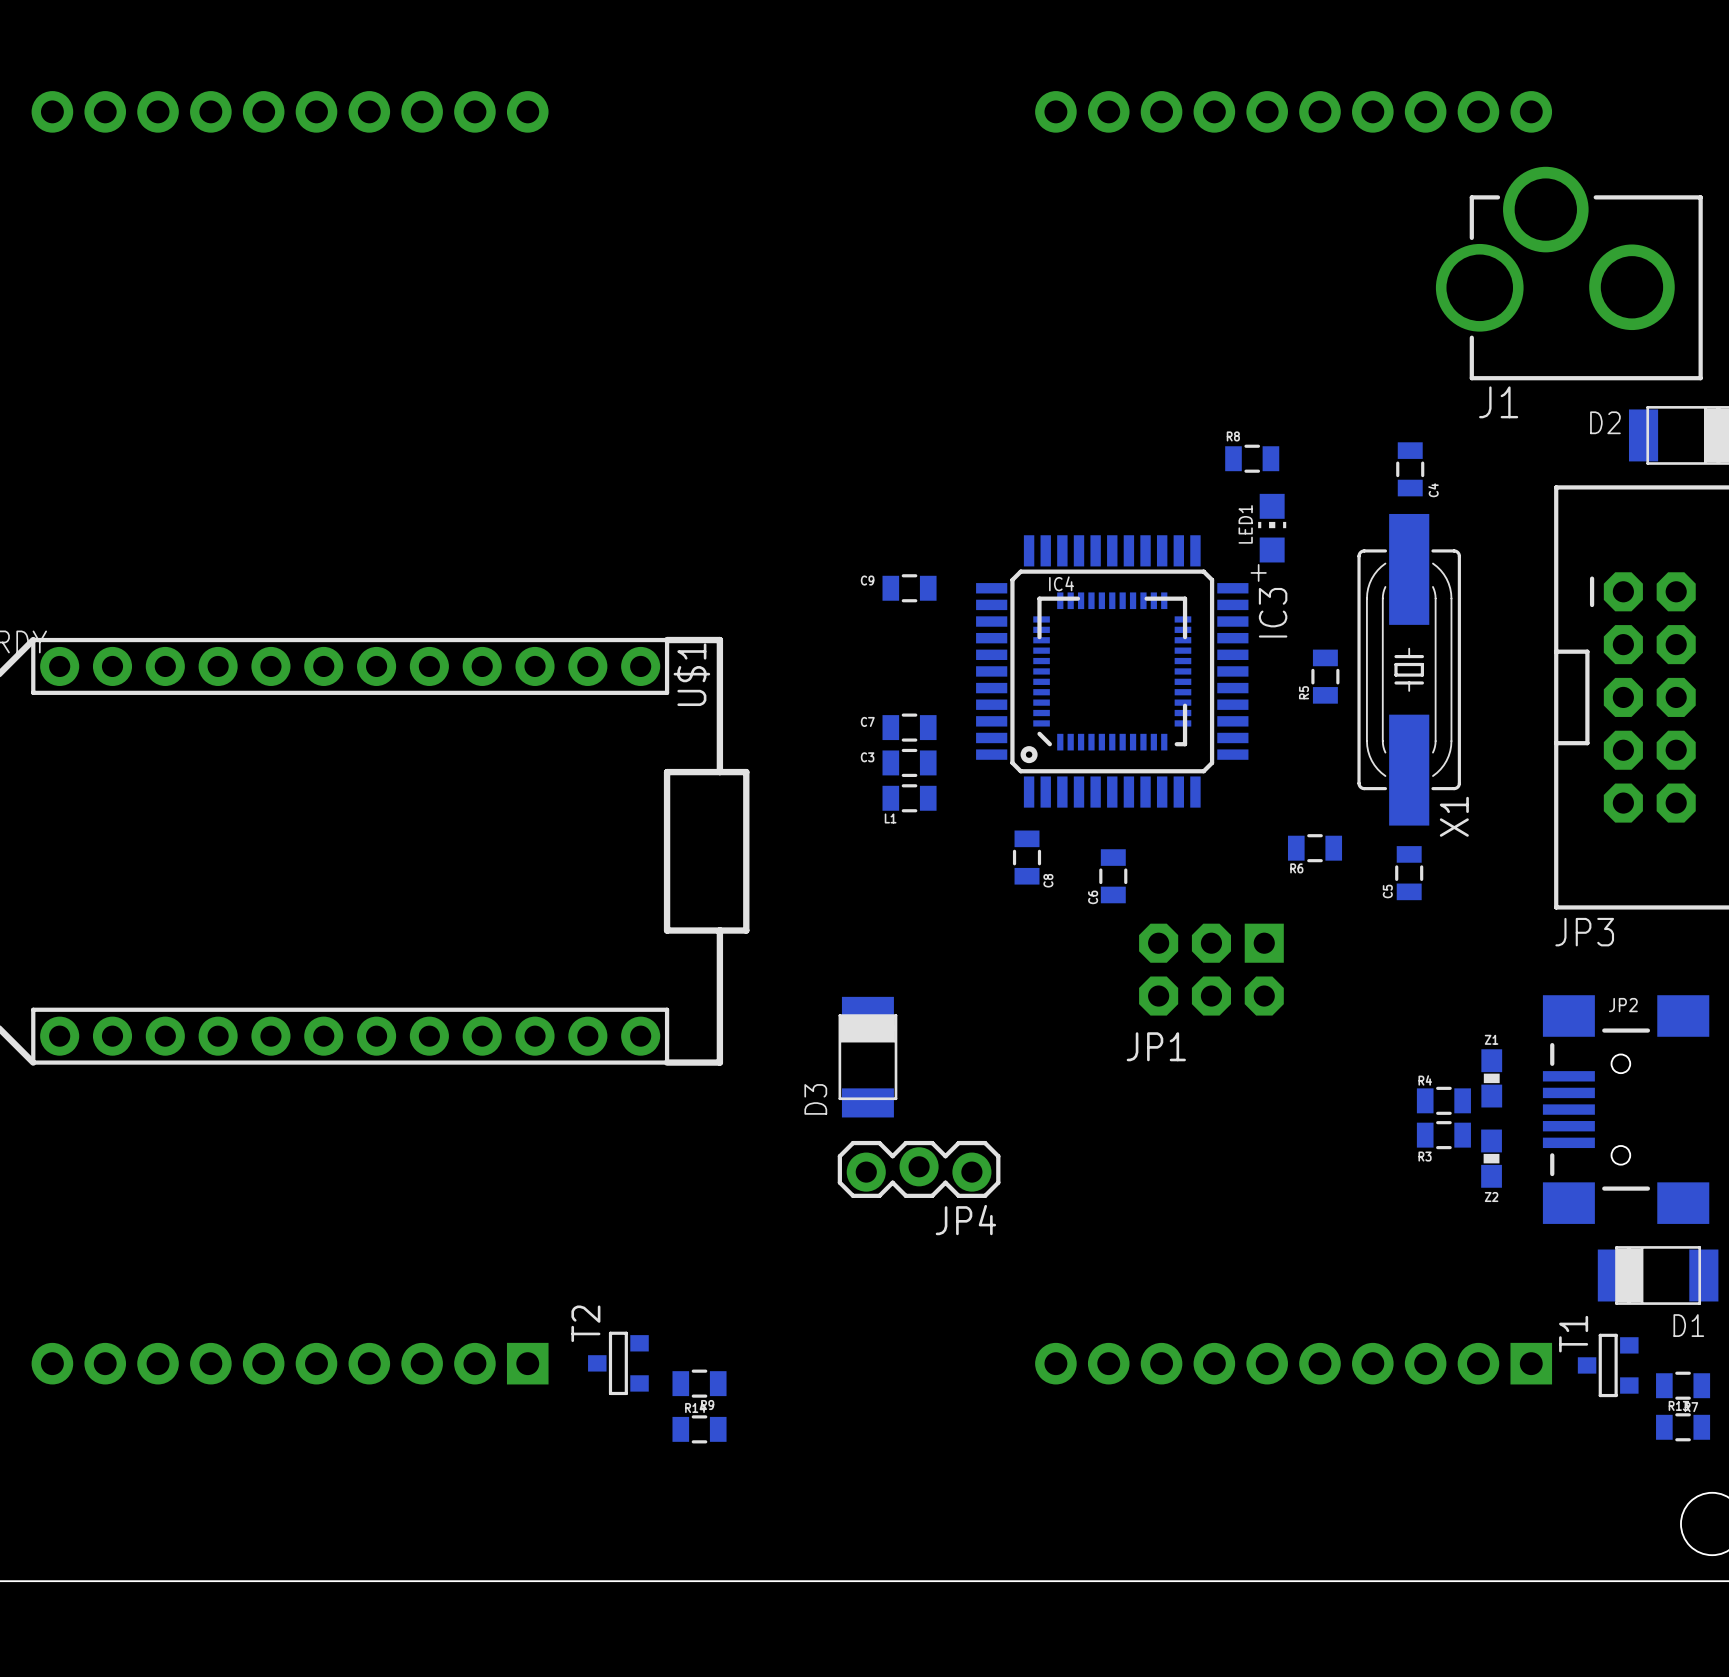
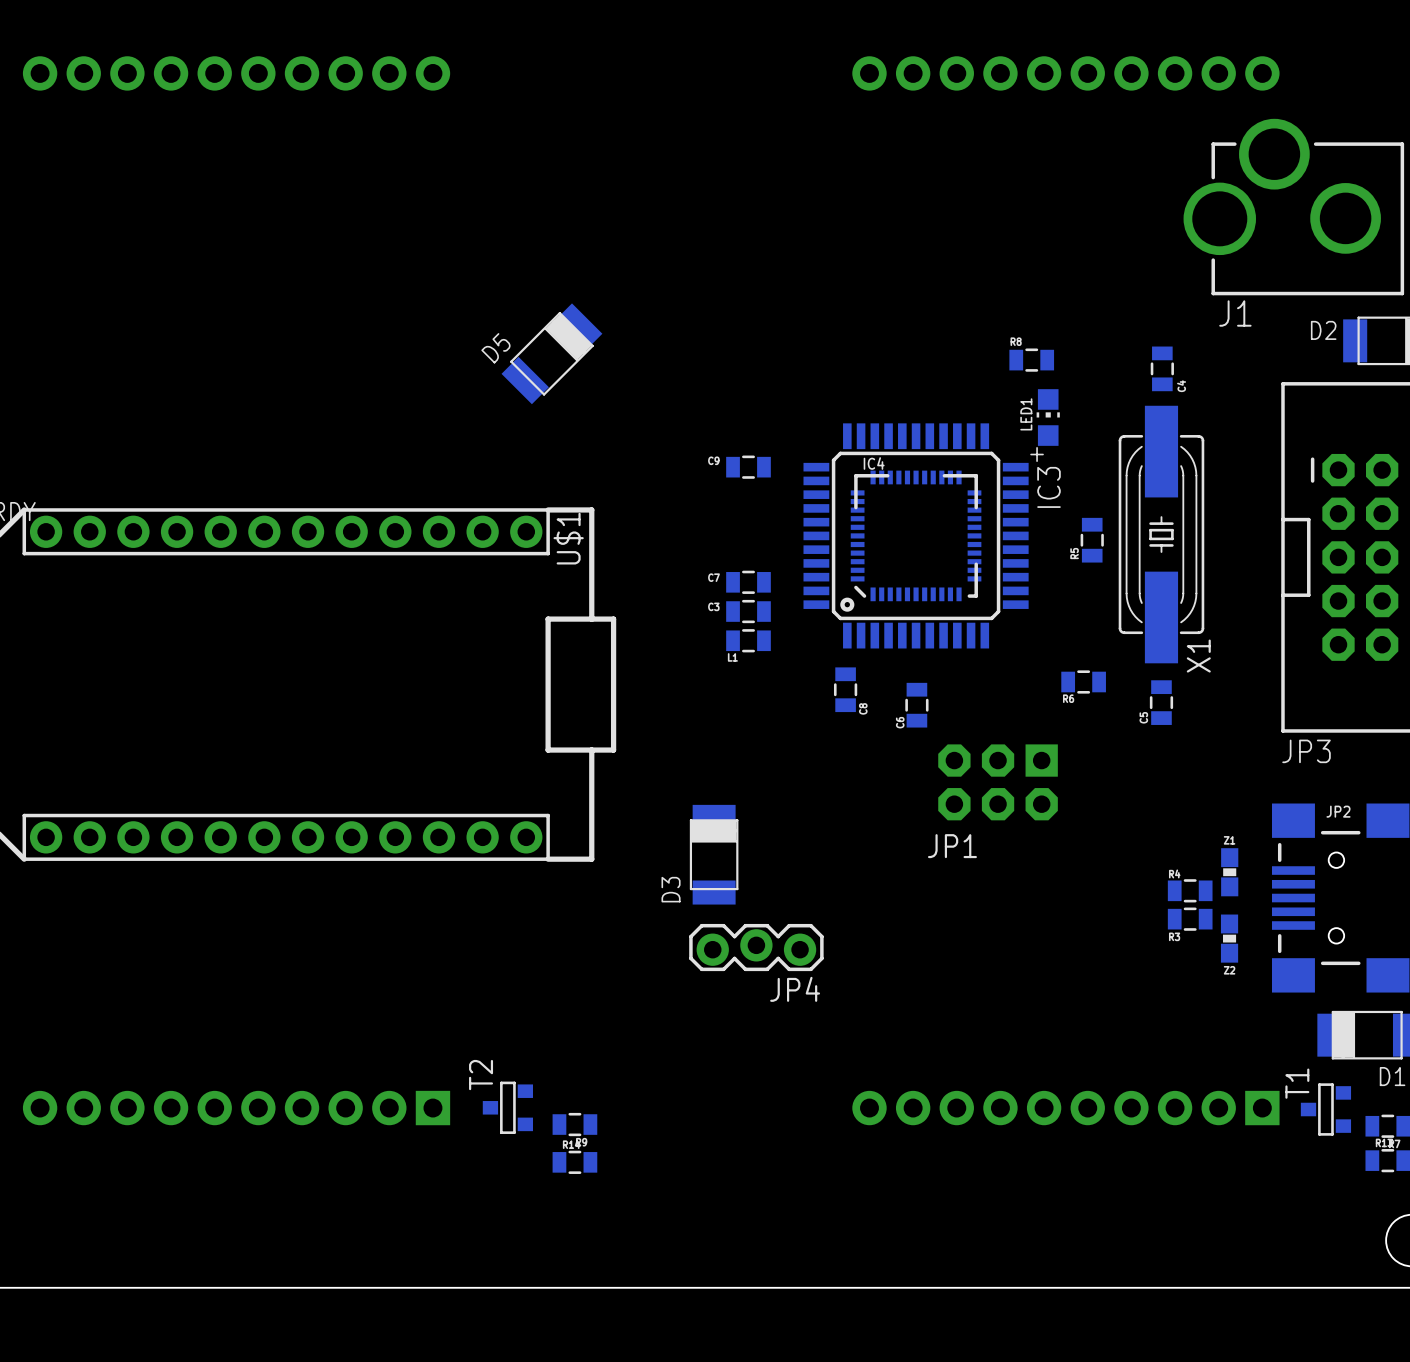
D5: none -> (551, 353)

